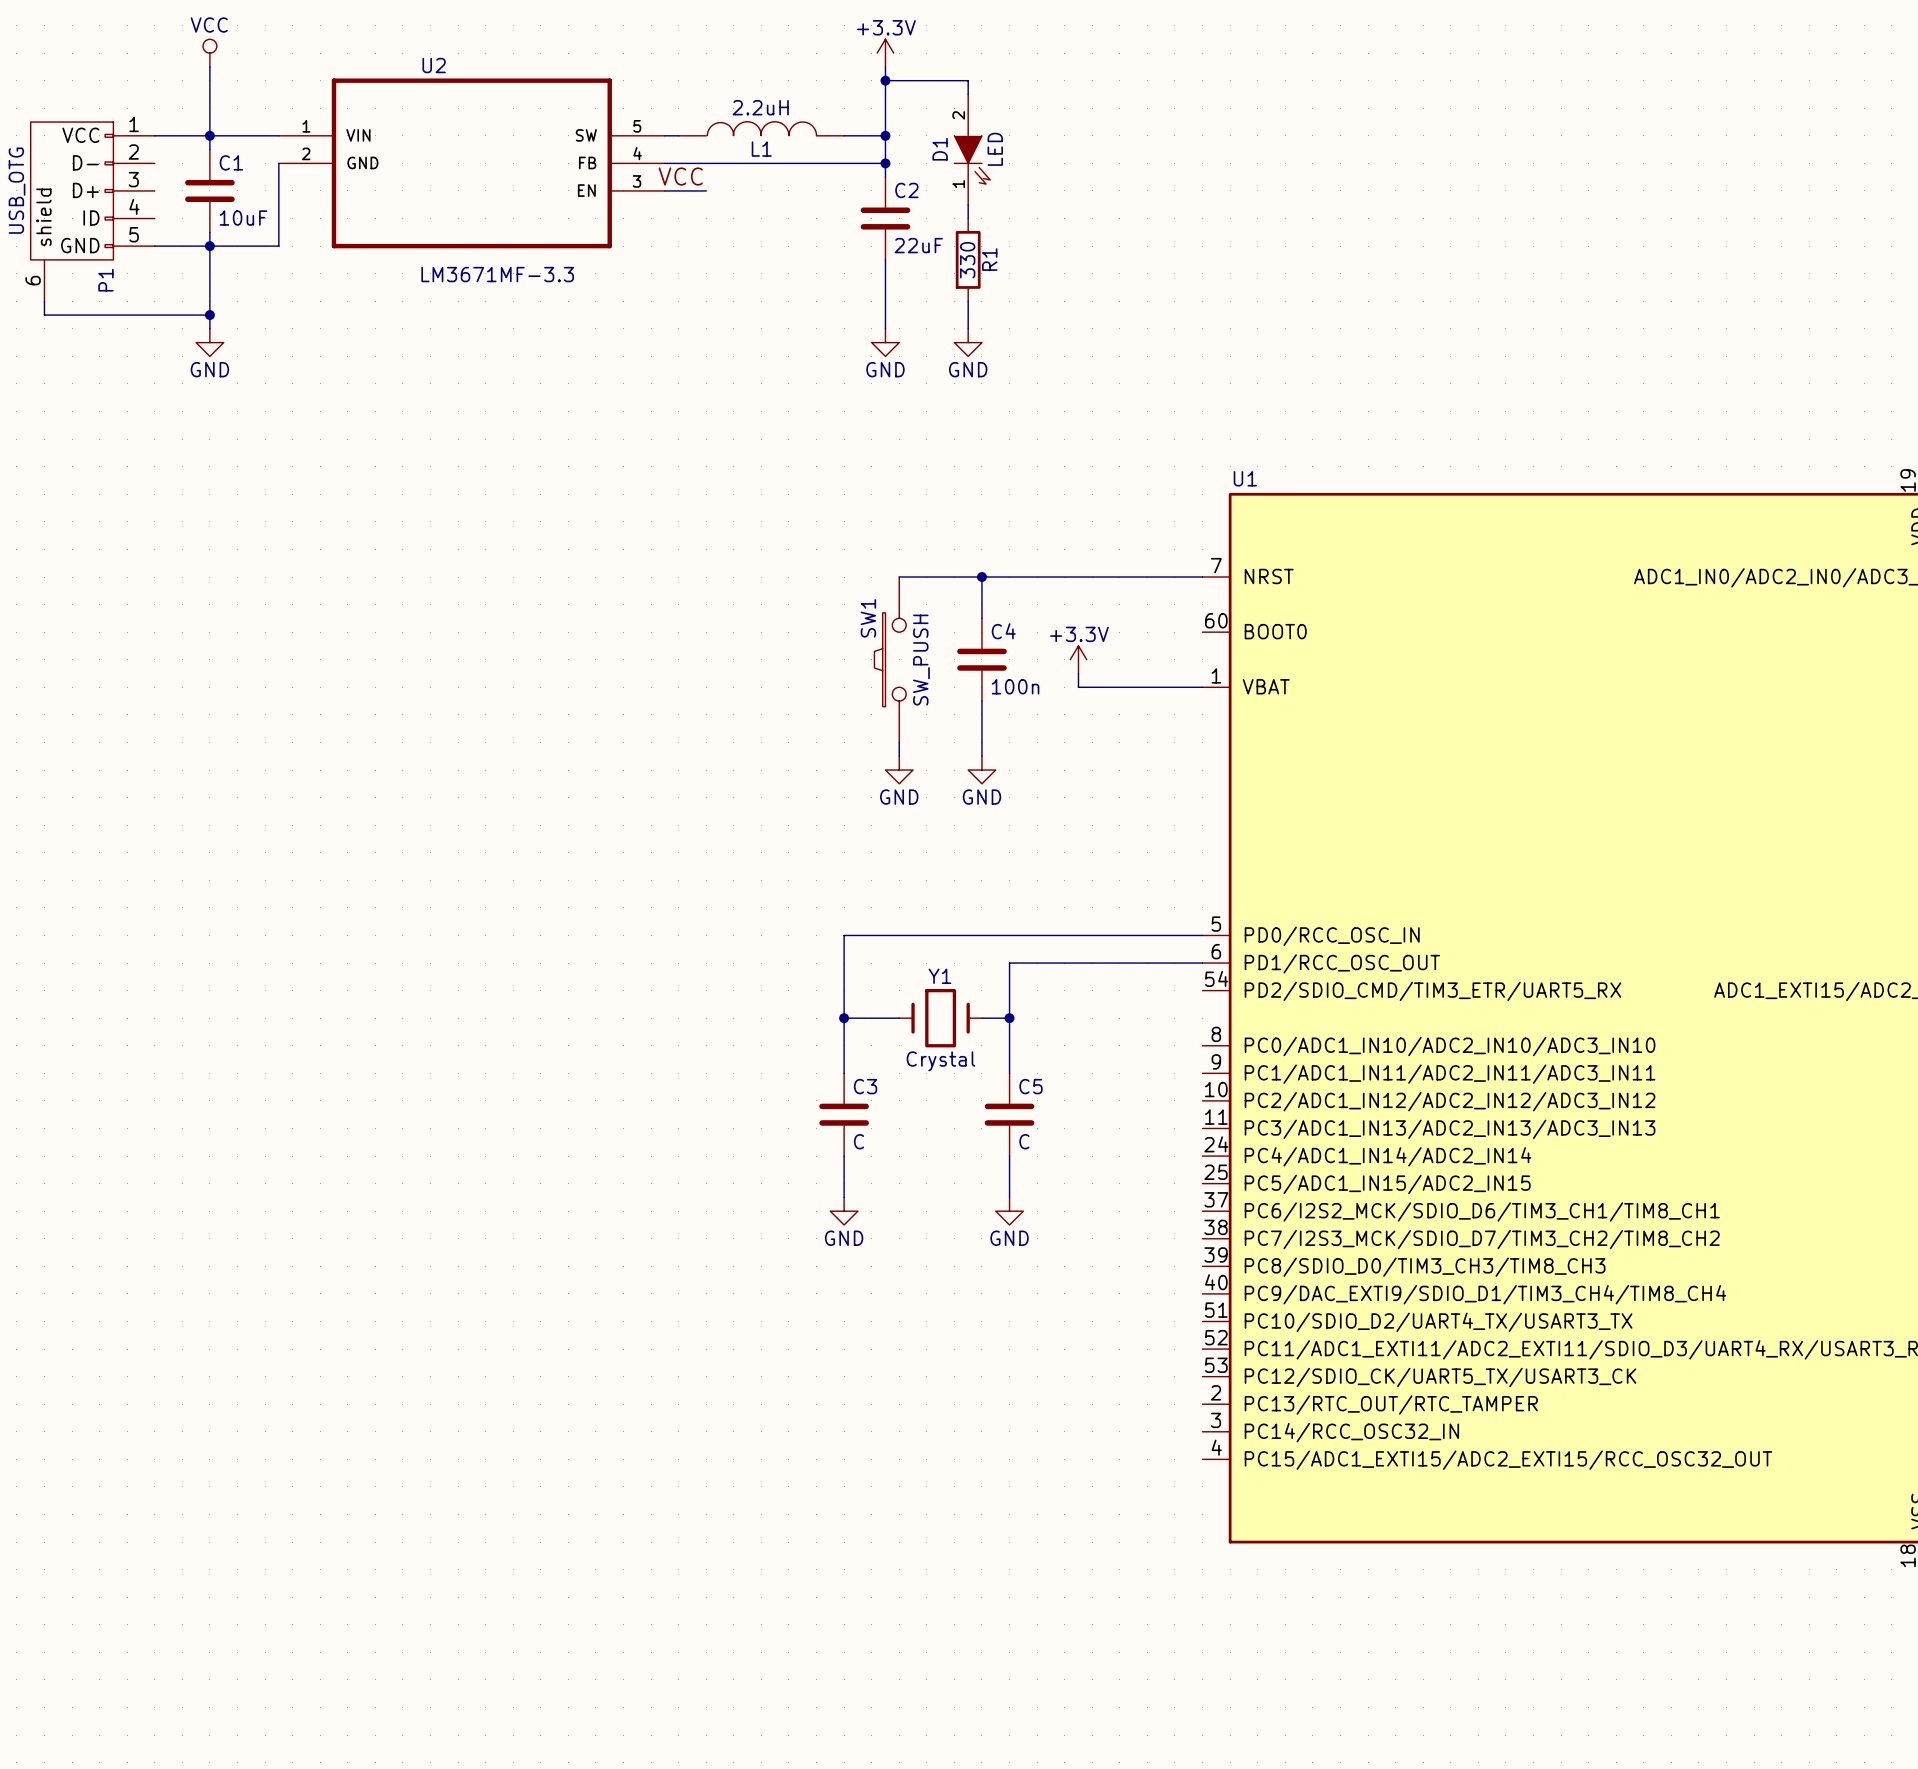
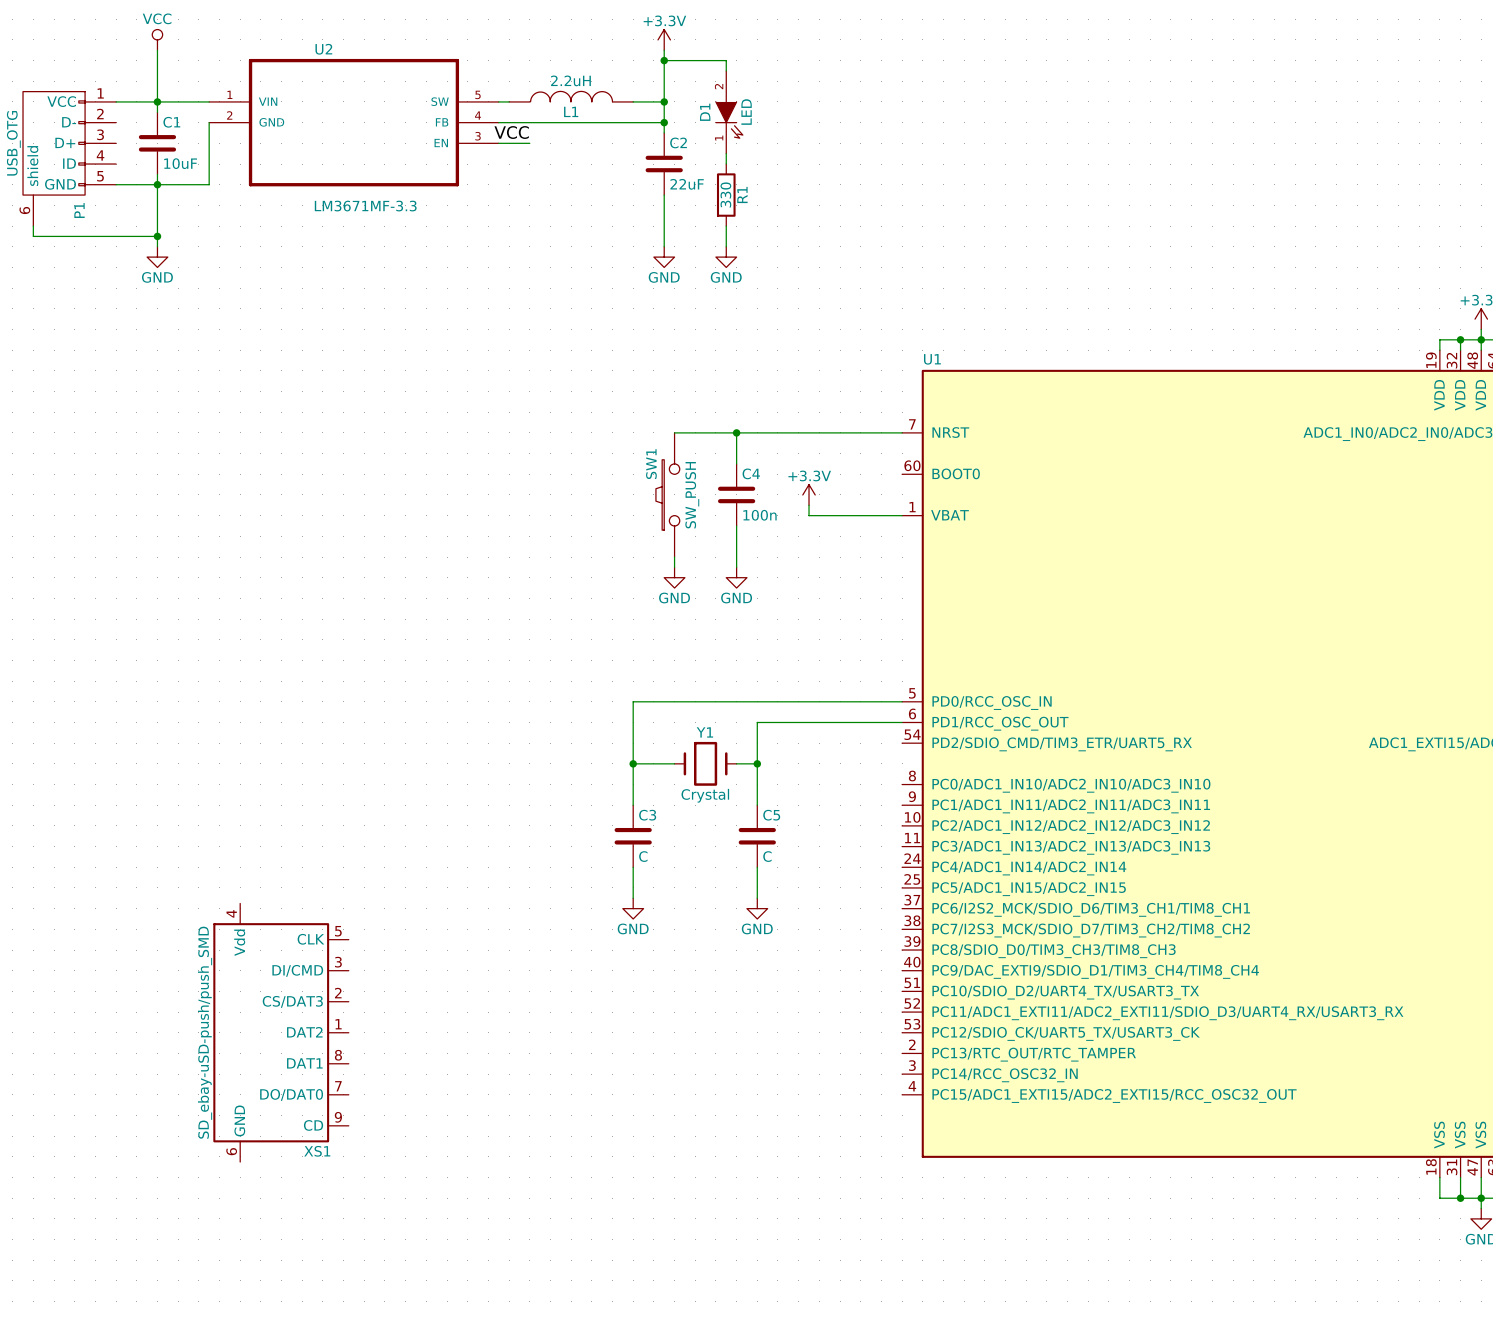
XS1: none -> SD_ebay-uSD-push/push_SMD (281, 1032)

